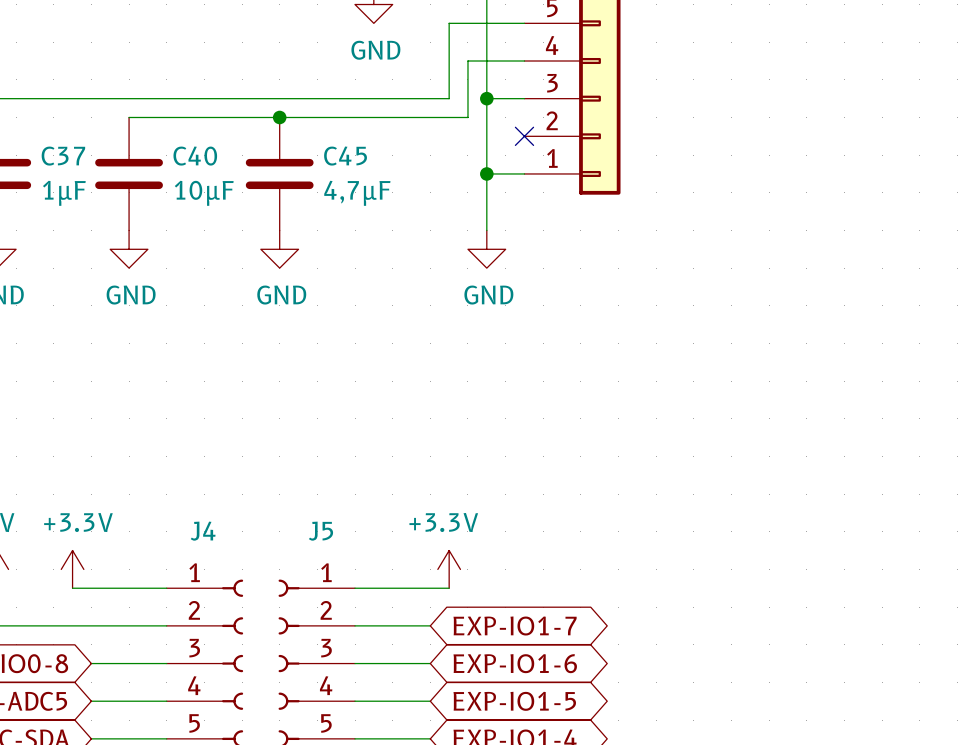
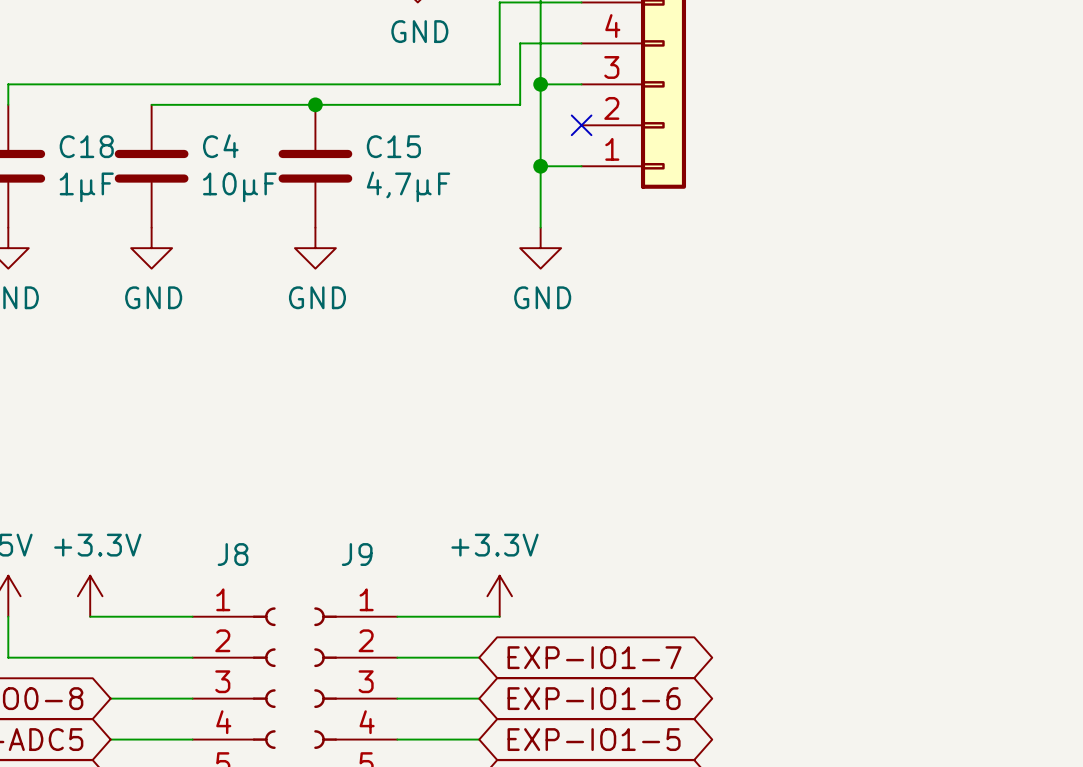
C37 name: C37 (63, 156) -> C18 (86, 146)
C40 name: C40 (195, 156) -> C4 (220, 146)
C45 name: C45 (345, 156) -> C15 (393, 146)
J4 name: J4 (203, 531) -> J8 (233, 554)
J5 name: J5 (321, 531) -> J9 (357, 554)

